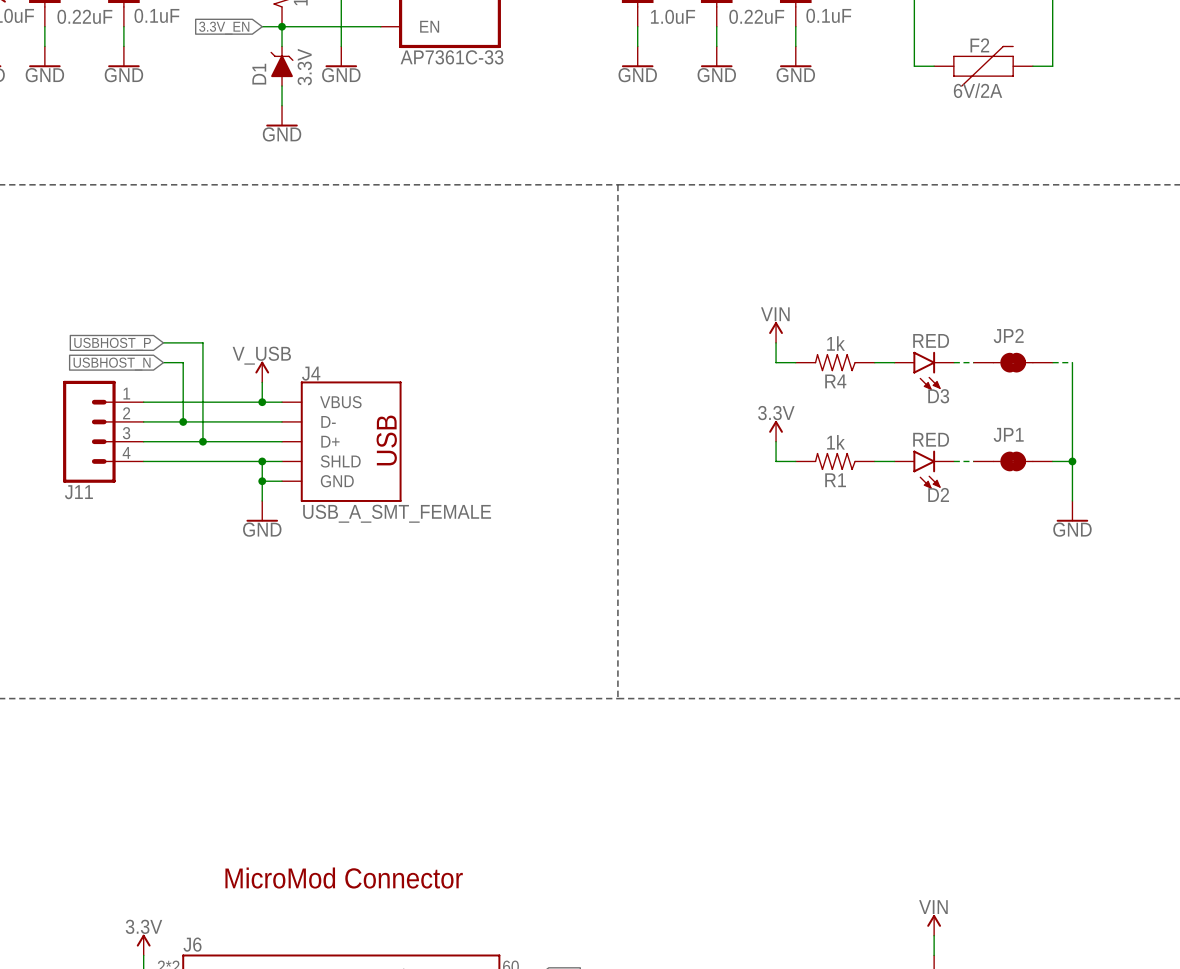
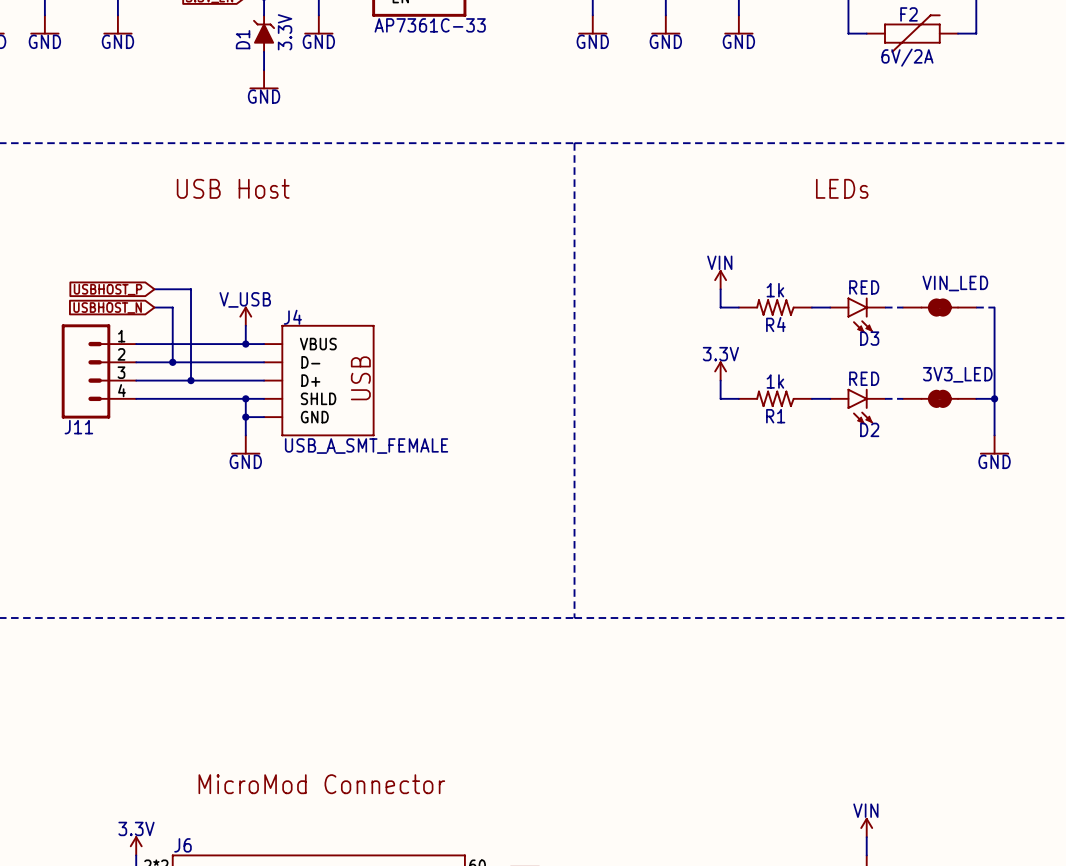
text: none -> USB Host (233, 188)
text: none -> LEDs (842, 188)
JP2 name: JP2 (1008, 335) -> VIN_LED (955, 283)
JP1 name: JP1 (1008, 434) -> 3V3_LED (957, 374)

